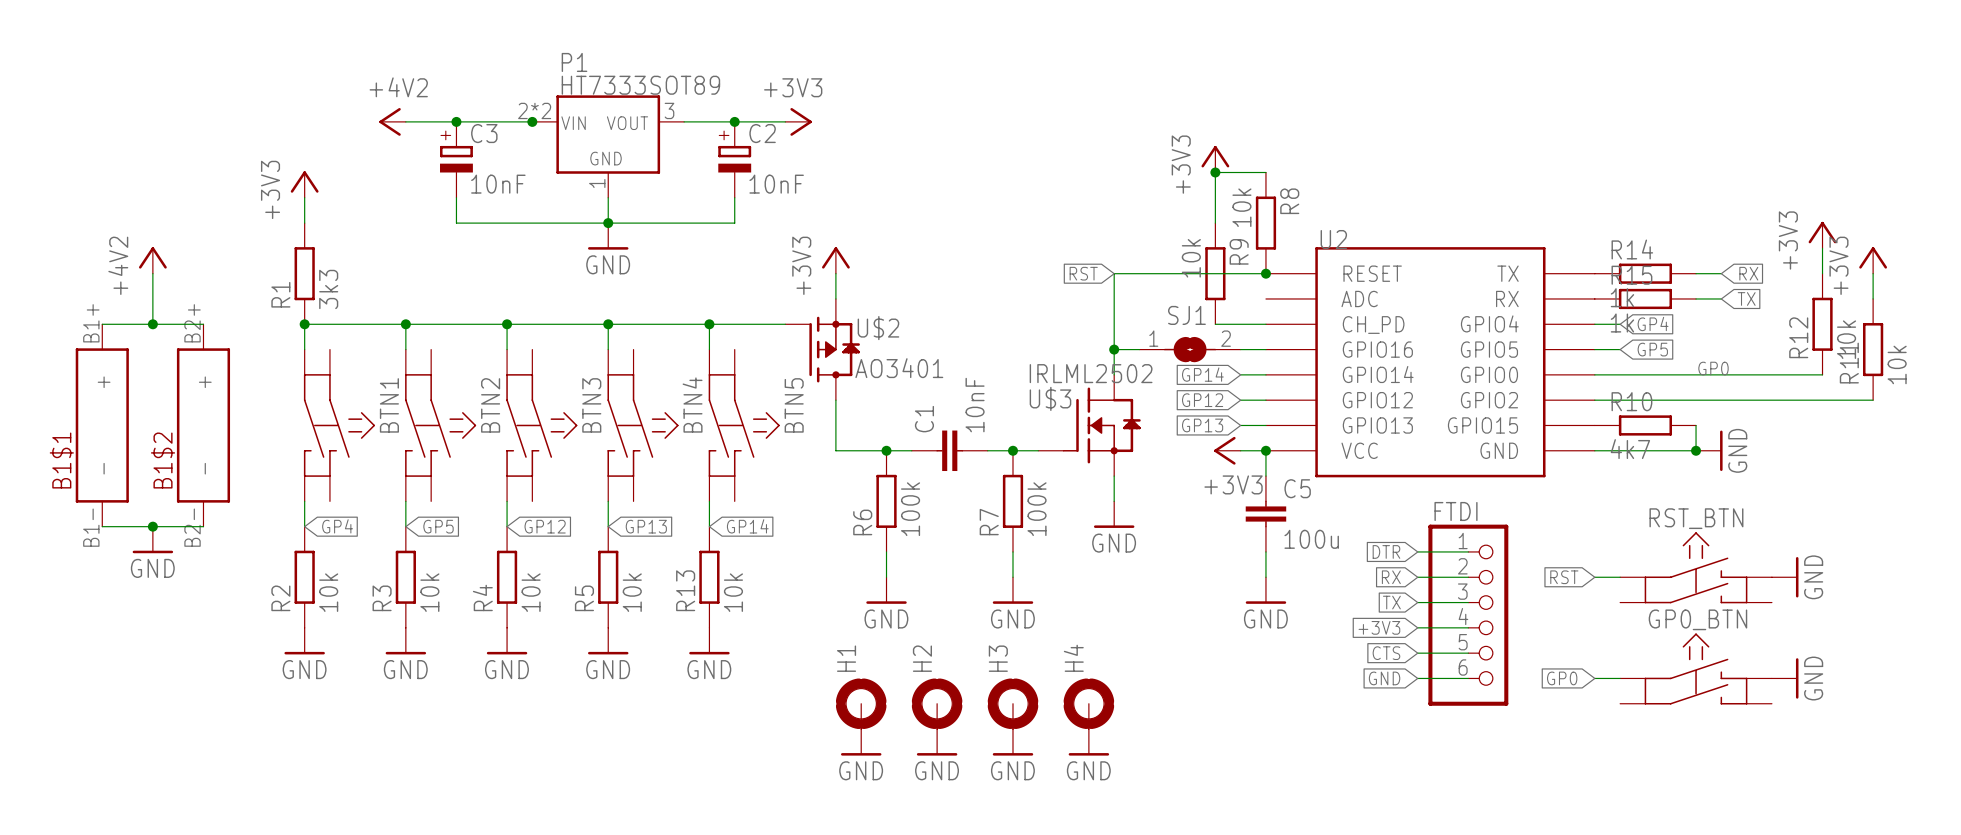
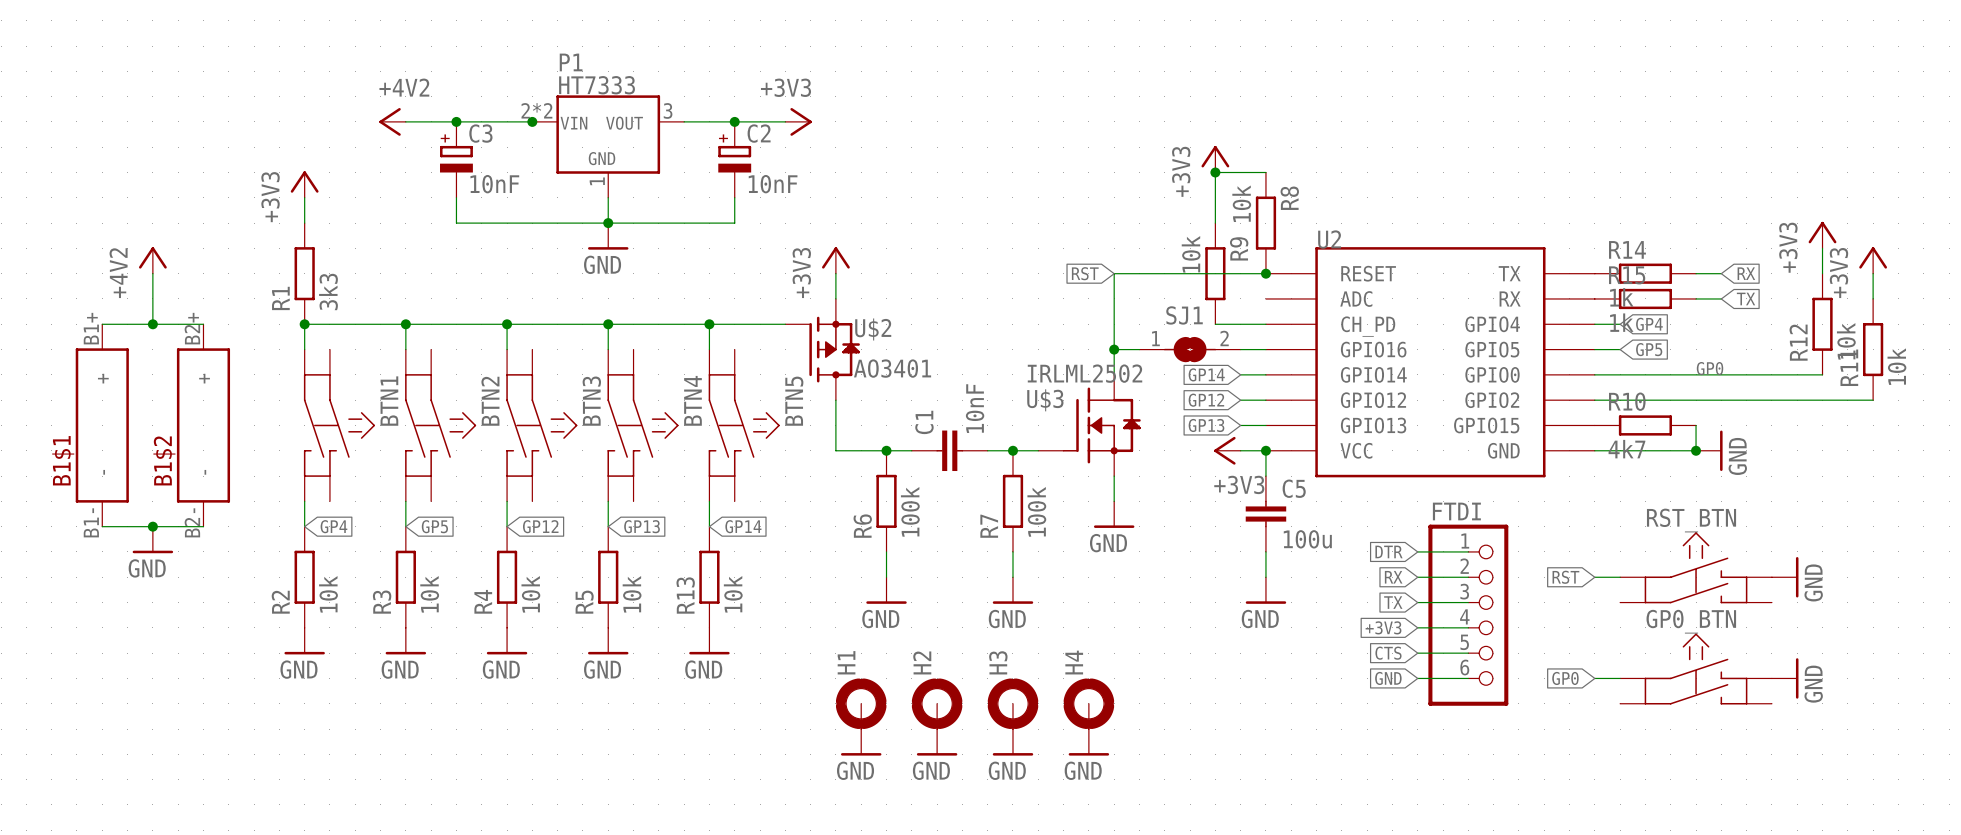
P1 value: HT7333SOT89 (640, 85) -> HT7333 (597, 85)

